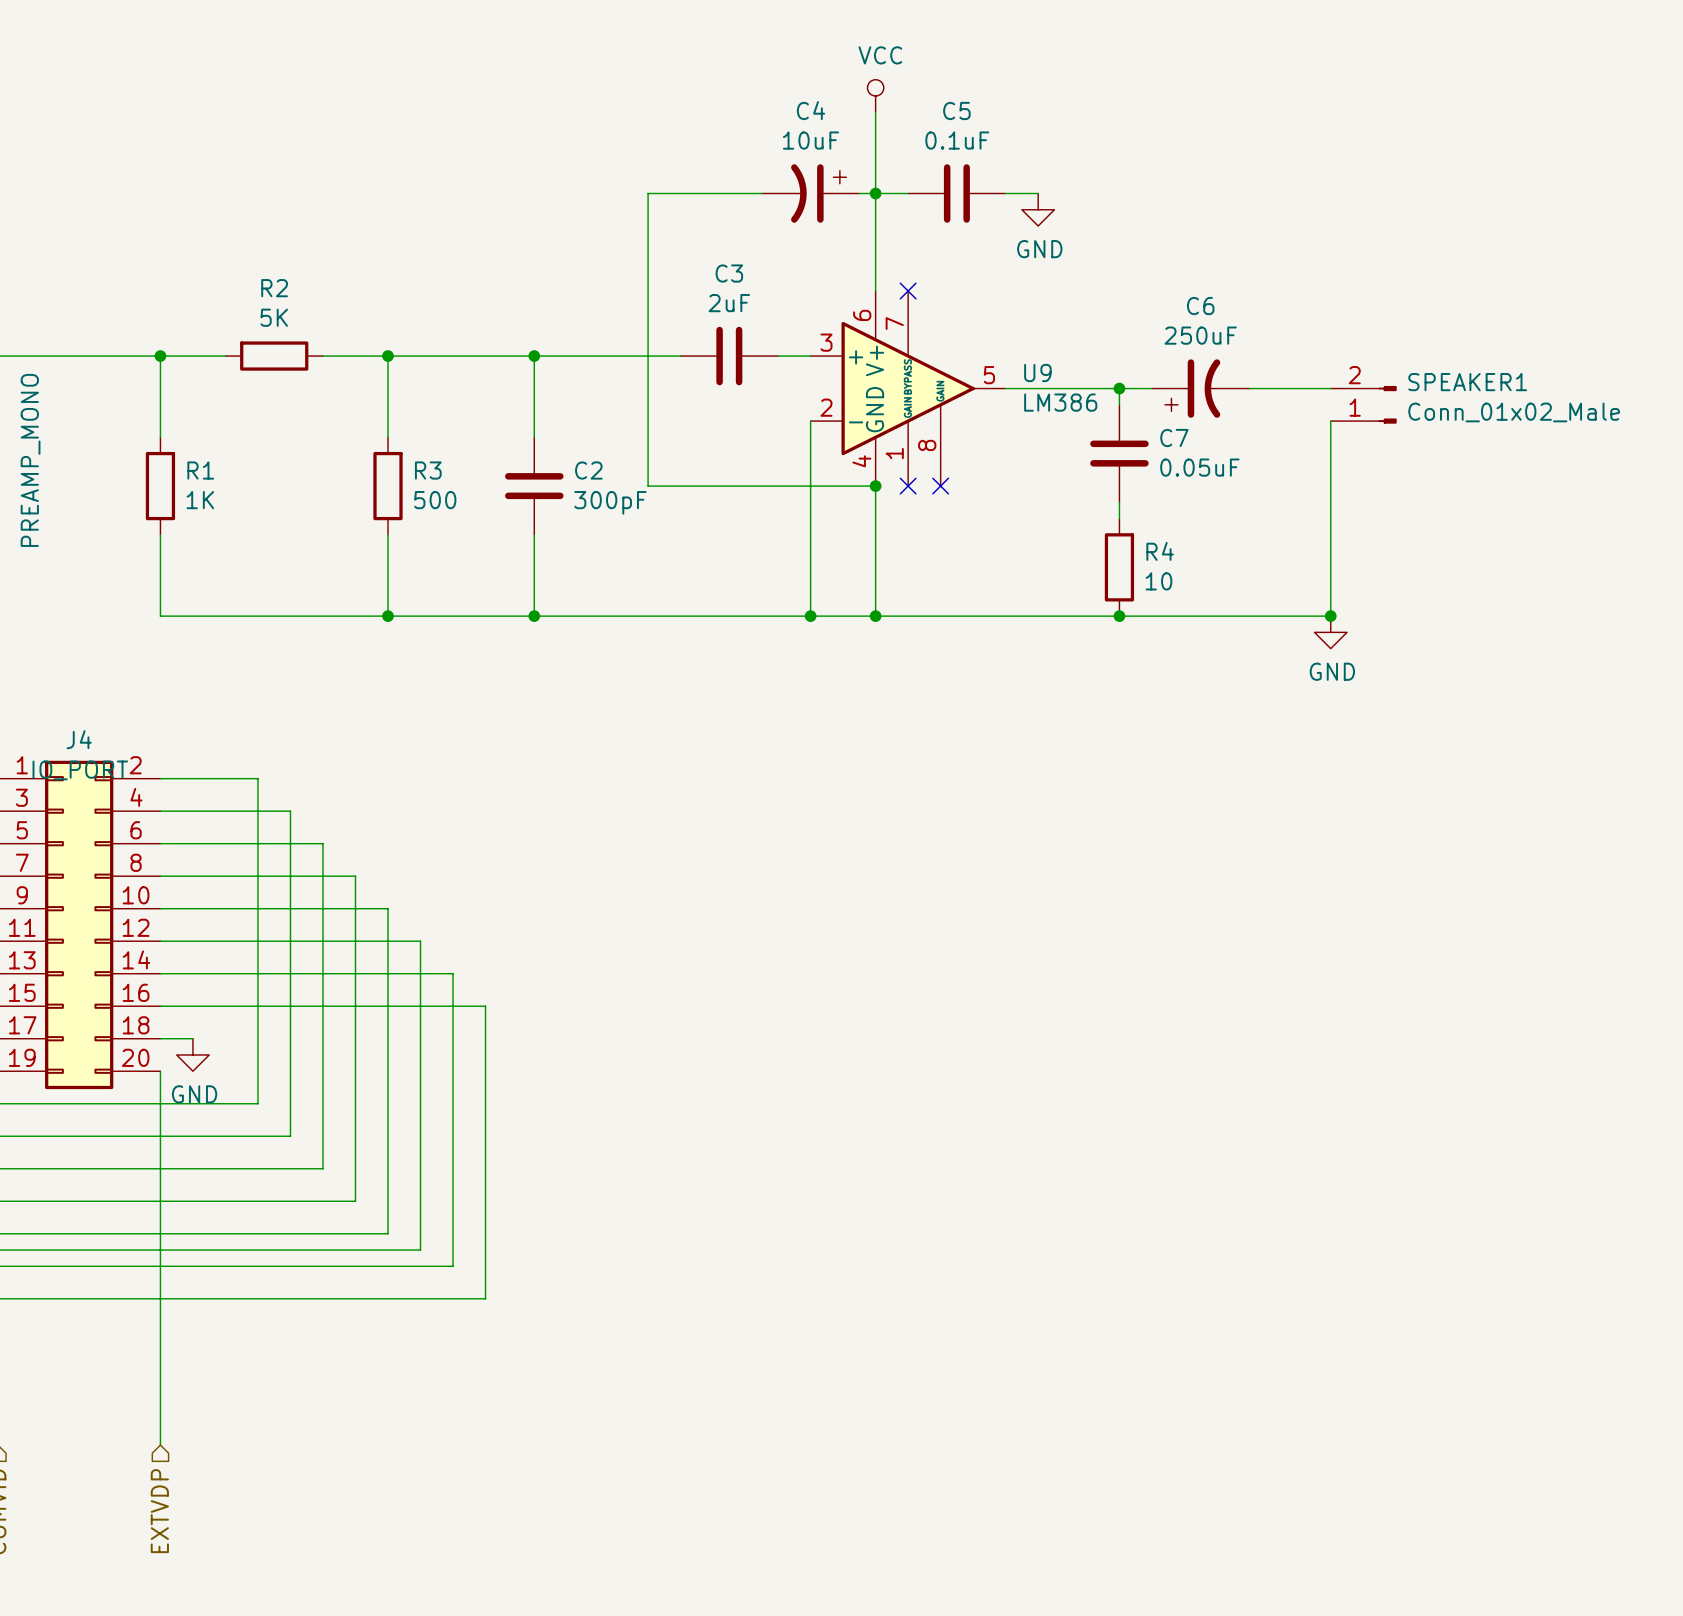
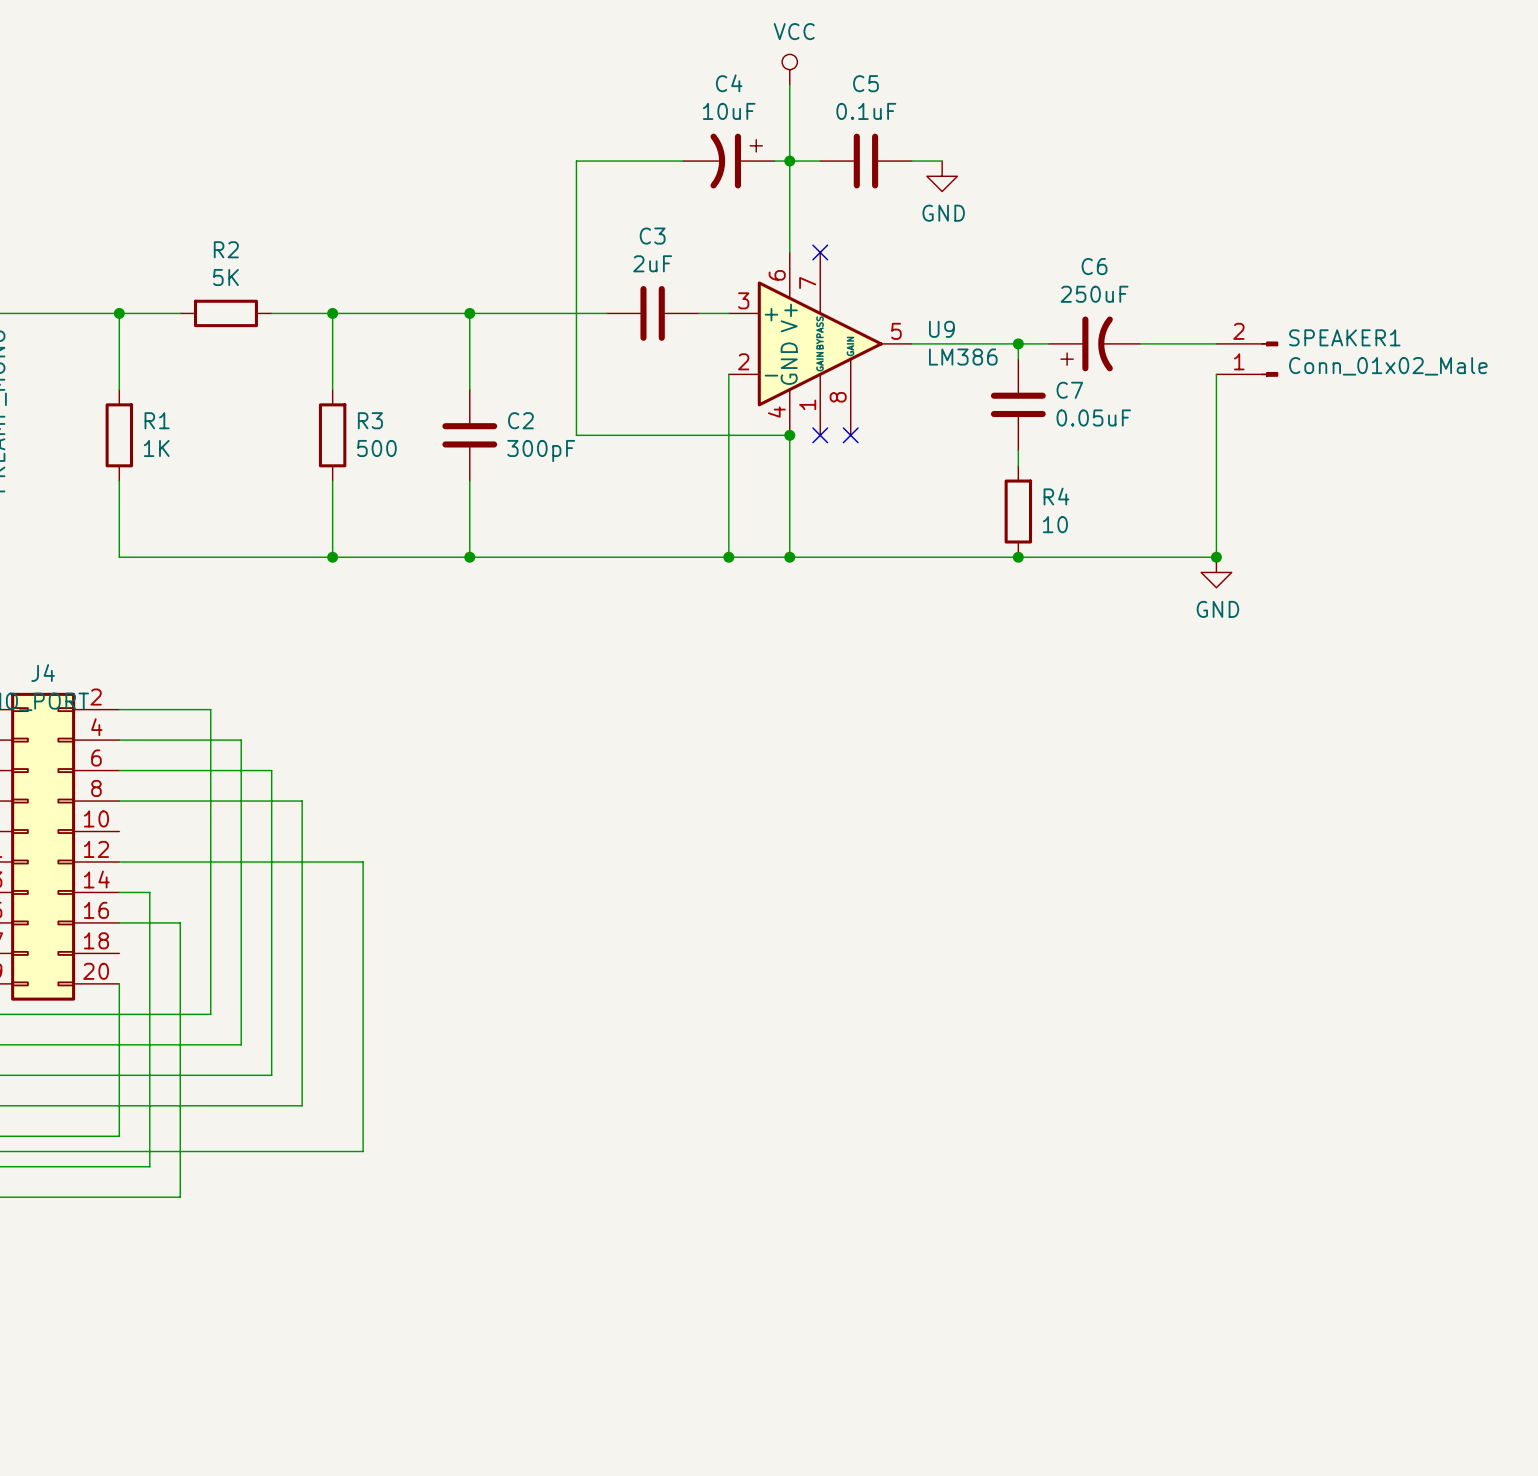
wire: (160, 908) (388, 908) (388, 1233) (160, 1233) (160, 1445) -> none
wire: (192, 973) (453, 973) (453, 1266) (192, 1266) -> (149, 892) (149, 1166)
wire: (225, 1006) (485, 1006) (485, 1298) (225, 1298) -> (180, 922) (180, 1197)
wire: (160, 1038) (192, 1038) -> none
power symbol: GND (192, 1054) -> none
hierarchical label: EXTVDP (159, 1511) -> none

